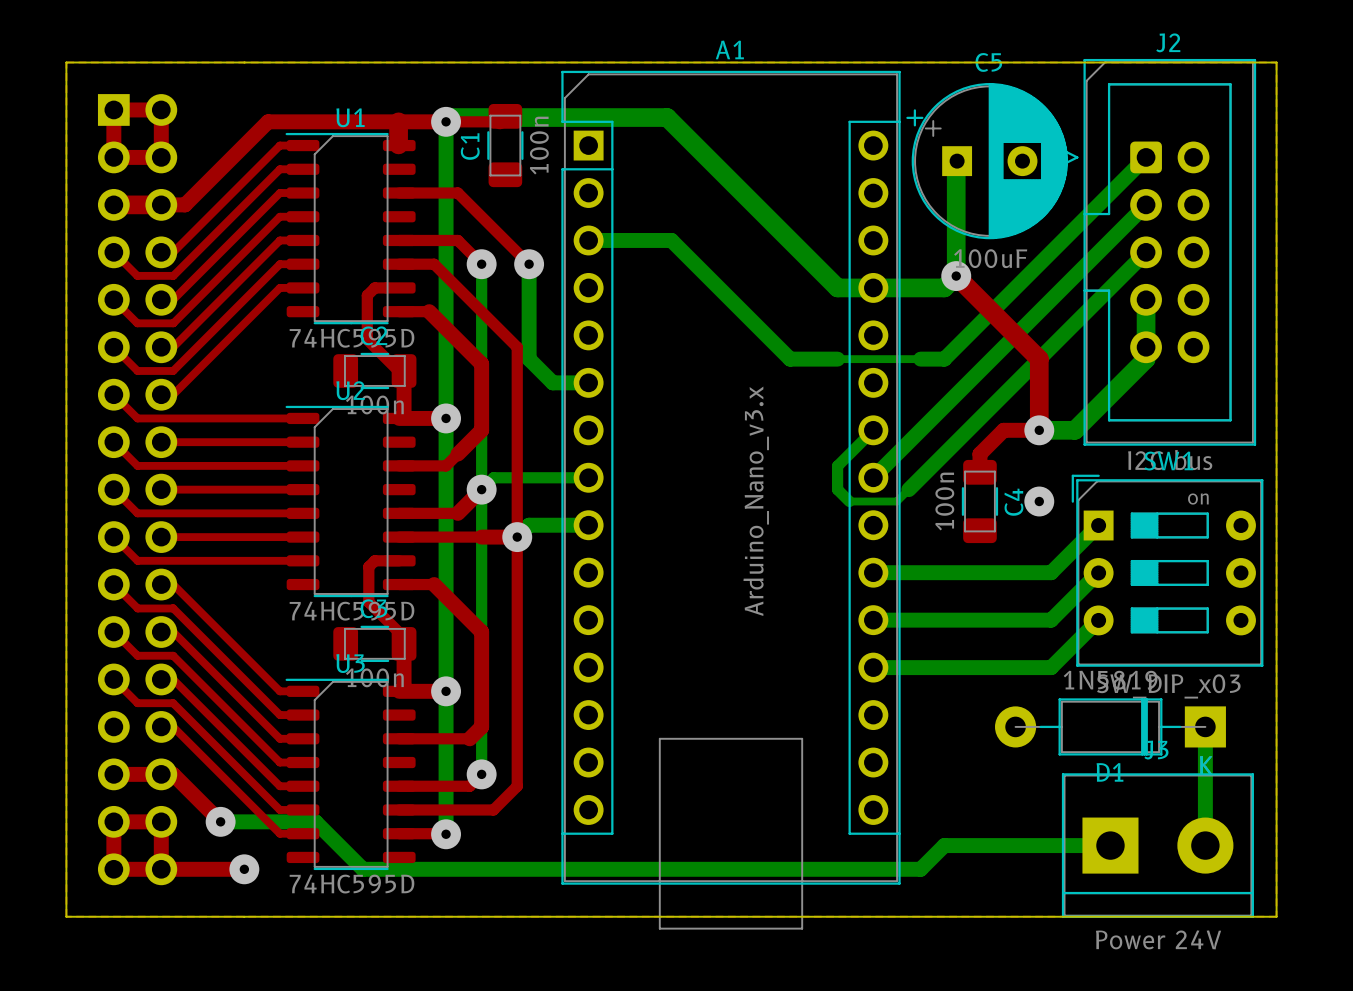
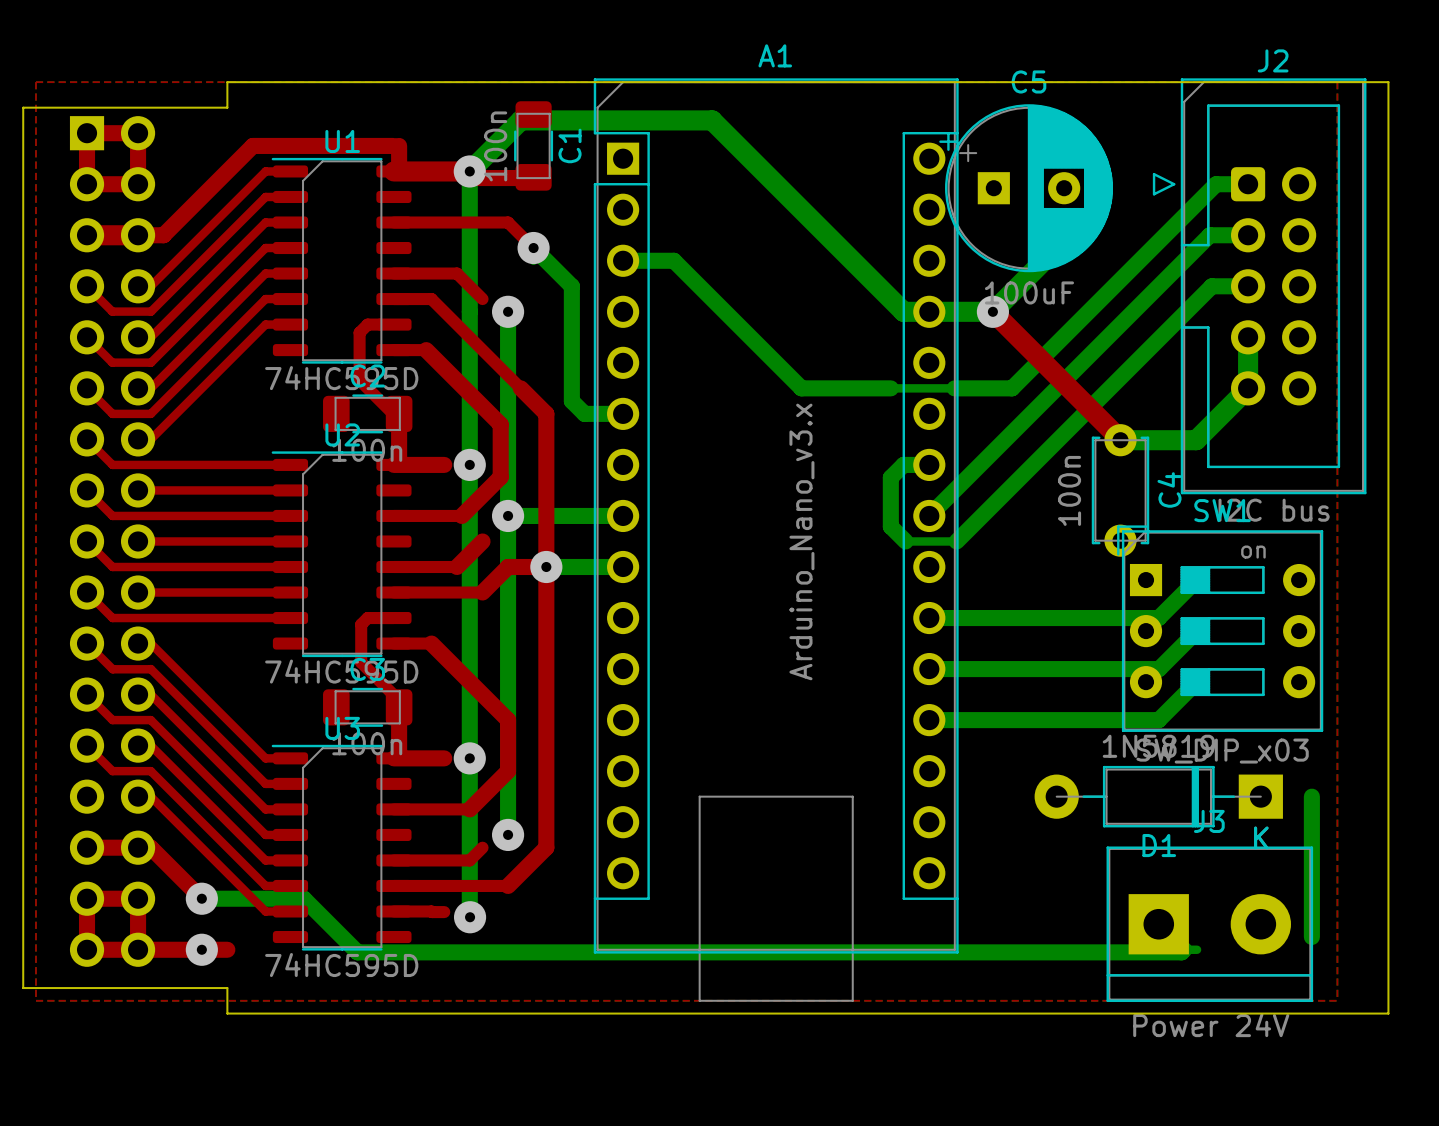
board edge: (244, 62) (66, 62) (66, 916) (1276, 916) (1276, 62) -> (227, 82) (227, 107) (23, 107) (23, 988) (227, 988) (227, 1013) (1388, 1013) (1388, 82) (1337, 82)
top track: (505, 116) (499, 121) (398, 121) (398, 144) -> none
top track: none -> (399, 145) (399, 166) (393, 171) (469, 171) (476, 178) (533, 177)
via position: (446, 121) -> (469, 171)
C1 position: (505, 145) -> (533, 145)
C1 value position: 100n (539, 145) -> 100n (495, 146)
C1 name position: C1 (470, 146) -> C1 (570, 145)
bottom track: (1146, 157) (944, 359) (790, 359) (778, 347) -> (1248, 184) (1216, 184) (1012, 388) (801, 388)
bottom track: (956, 162) (956, 276) (944, 287) (837, 287) (667, 117) (450, 117) (446, 121) (446, 834) -> none
bottom track: none -> (1069, 217) (1069, 235) (992, 311) (903, 311) (712, 120) (520, 120) (469, 171) (469, 916)
top track: (457, 193) (529, 264) -> (457, 222) (508, 222) (533, 248)
bottom track: (1146, 204) (873, 477) -> none
bottom track: none -> (1235, 235) (1209, 235) (929, 515)
via: none -> (533, 248)
bottom track: none -> (533, 260) (533, 248) (571, 286) (571, 401) (584, 413) (623, 413)
bottom track: (588, 240) (671, 240) -> (623, 260) (673, 260) (686, 273)
bottom track: (1146, 252) (896, 501) (849, 501) (837, 489) (837, 466) (873, 430) -> none
J2 position: (1156, 252) -> (1259, 286)
bottom track: none -> (1235, 286) (1211, 286) (956, 541) (905, 541) (890, 526) (890, 477) (903, 464) (929, 464)
bottom track: (481, 264) (481, 774) -> none
via: (481, 264) -> none
bottom track: (529, 264) (529, 359) (552, 382) (588, 382) -> none
via: (529, 264) -> none
bottom track: none -> (508, 311) (508, 834)
via: none -> (508, 311)
bottom track: (1146, 299) (1146, 359) (1074, 430) (1039, 430) -> none
bottom track: none -> (1248, 337) (1248, 388) (1196, 440) (1120, 440)
top track: (517, 347) (517, 786) (493, 809) -> (520, 388) (546, 413) (546, 847) (508, 885) (495, 885)
top track: (1039, 359) (1039, 430) (1003, 430) (979, 454) (979, 472) -> (1082, 401) (1120, 439)
top track: (481, 364) (481, 430) (446, 465) -> (482, 406) (500, 424) (500, 477) (461, 515) (444, 515)
via position: (446, 418) -> (469, 464)
via: (1039, 430) -> none
C4 footprint: [961, 459, 999, 544] -> [1091, 424, 1150, 557]
bottom track: none -> (508, 515) (623, 515)
via: none -> (508, 515)
bottom track: (588, 477) (493, 477) (481, 489) -> none
via: (481, 489) -> none
A1 position: (730, 500) -> (776, 540)
via: (1039, 501) -> none
bottom track: none -> (546, 566) (622, 566)
via: none -> (546, 566)
bottom track: (588, 525) (529, 525) (517, 537) -> none
bottom track: (1098, 525) (1051, 572) (873, 572) -> none
bottom track: none -> (1196, 580) (1158, 618) (929, 618)
top track: (481, 537) (517, 537) -> (482, 592) (508, 566) (546, 566)
via: (517, 537) -> none
bottom track: (1098, 572) (1051, 620) (873, 620) -> none
bottom track: none -> (1197, 631) (1159, 669) (929, 669)
bottom track: (1098, 620) (1051, 667) (873, 667) -> none
bottom track: none -> (1196, 682) (1158, 720) (929, 720)
top track: (481, 632) (481, 726) -> (482, 694) (508, 720) (508, 771) (482, 796)
via position: (446, 691) -> (469, 758)
bottom track: (1205, 726) (1205, 845) -> none
bottom track: none -> (1311, 796) (1311, 937)
via position: (481, 774) -> (508, 834)
via position: (446, 834) -> (470, 917)
bottom track: (1110, 845) (944, 845) (920, 869) (363, 869) -> (1197, 949) (1184, 949) (1181, 952) (357, 952) (354, 949)
via position: (244, 869) -> (201, 949)

